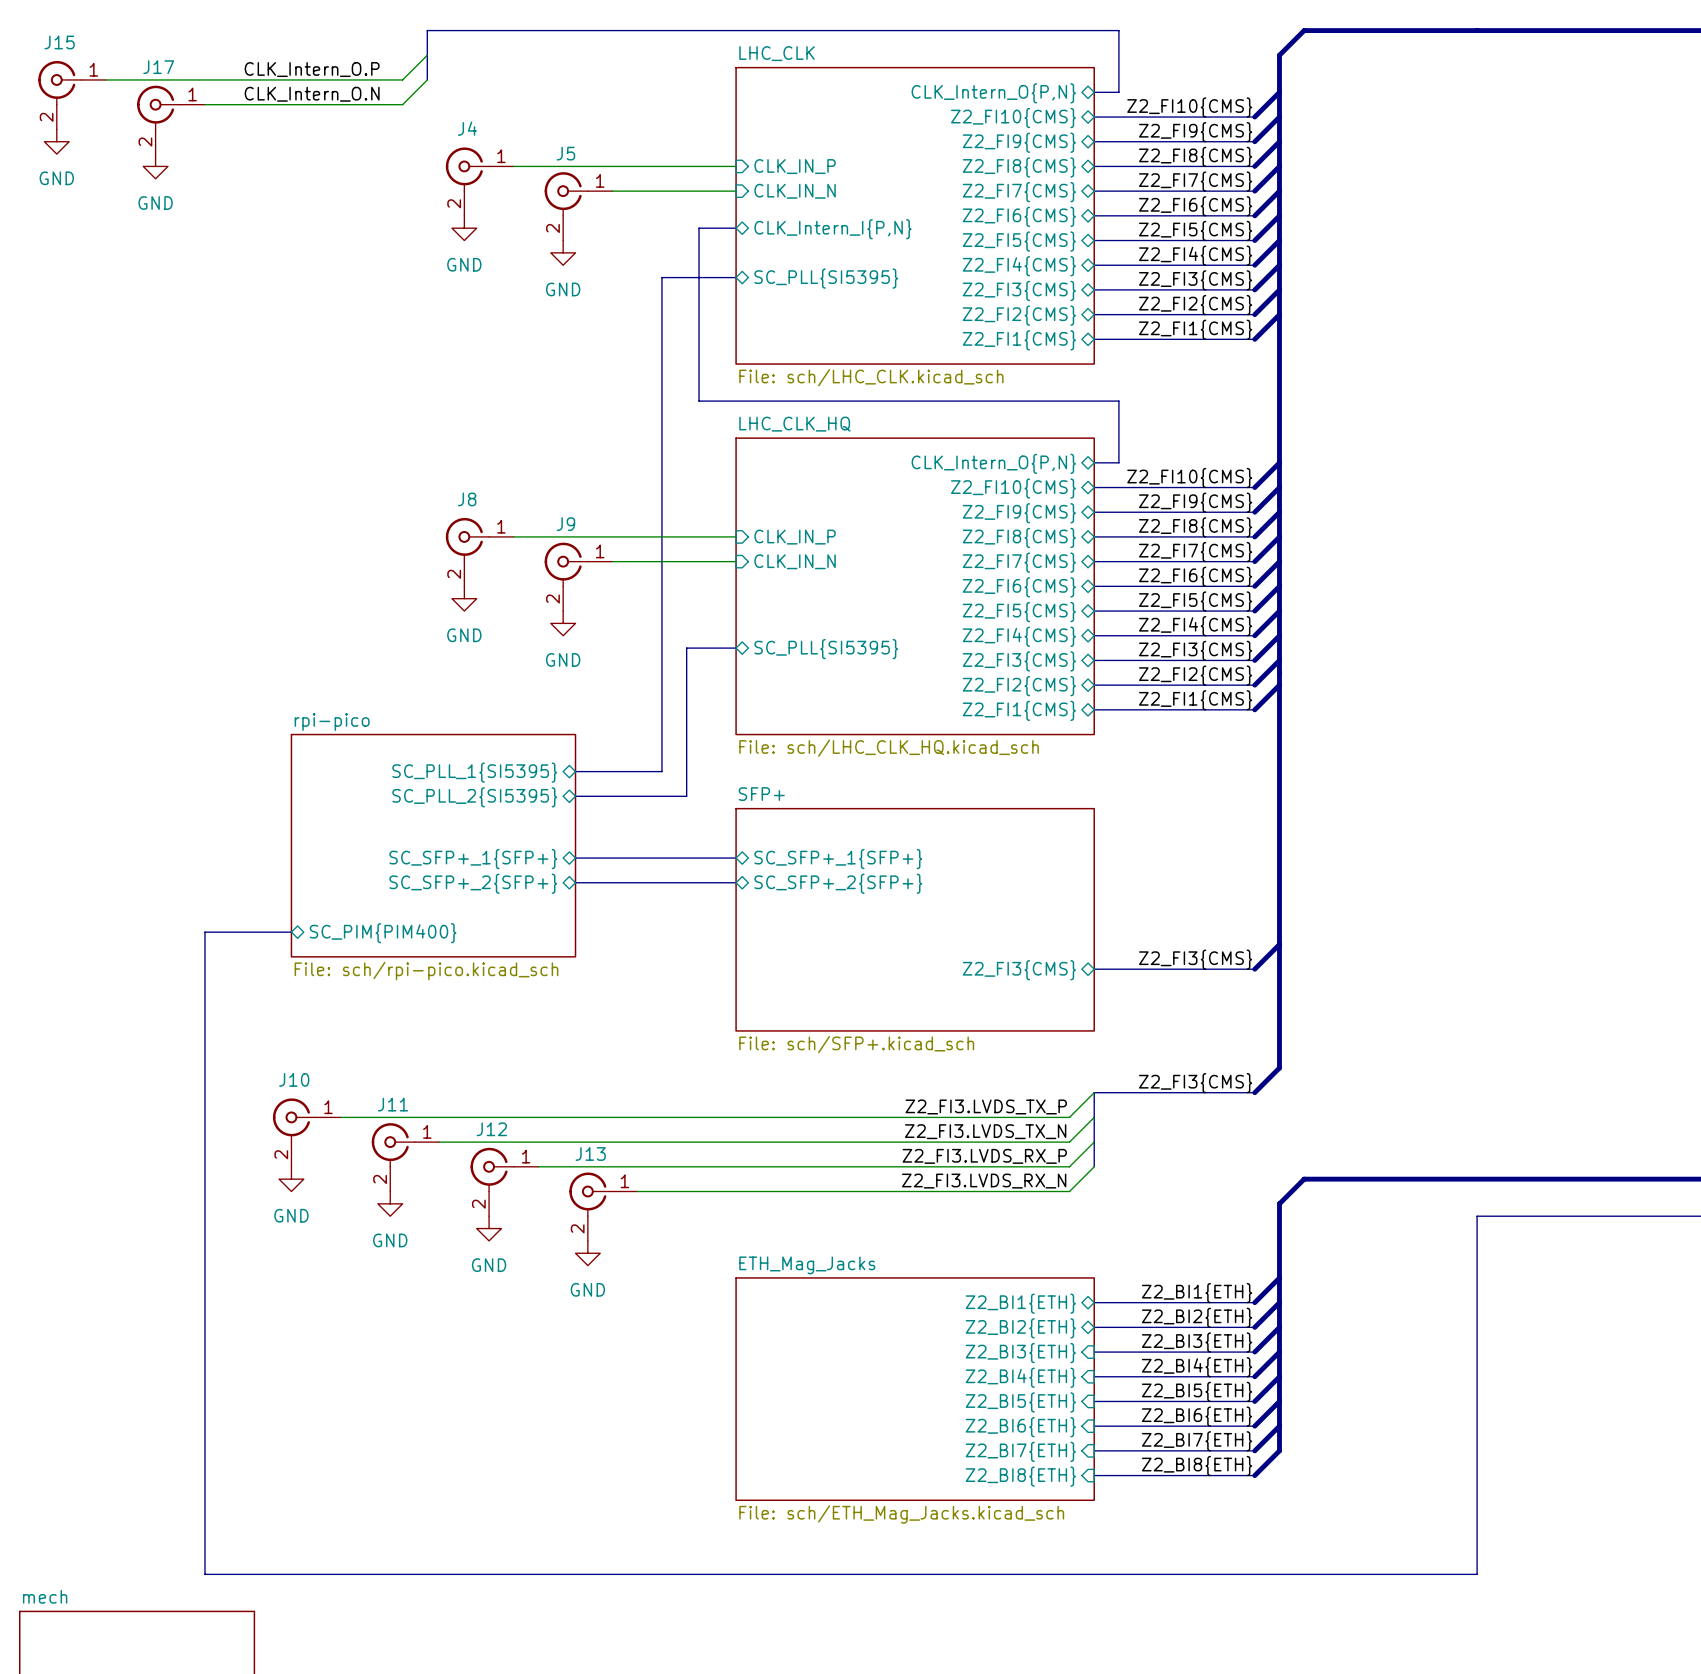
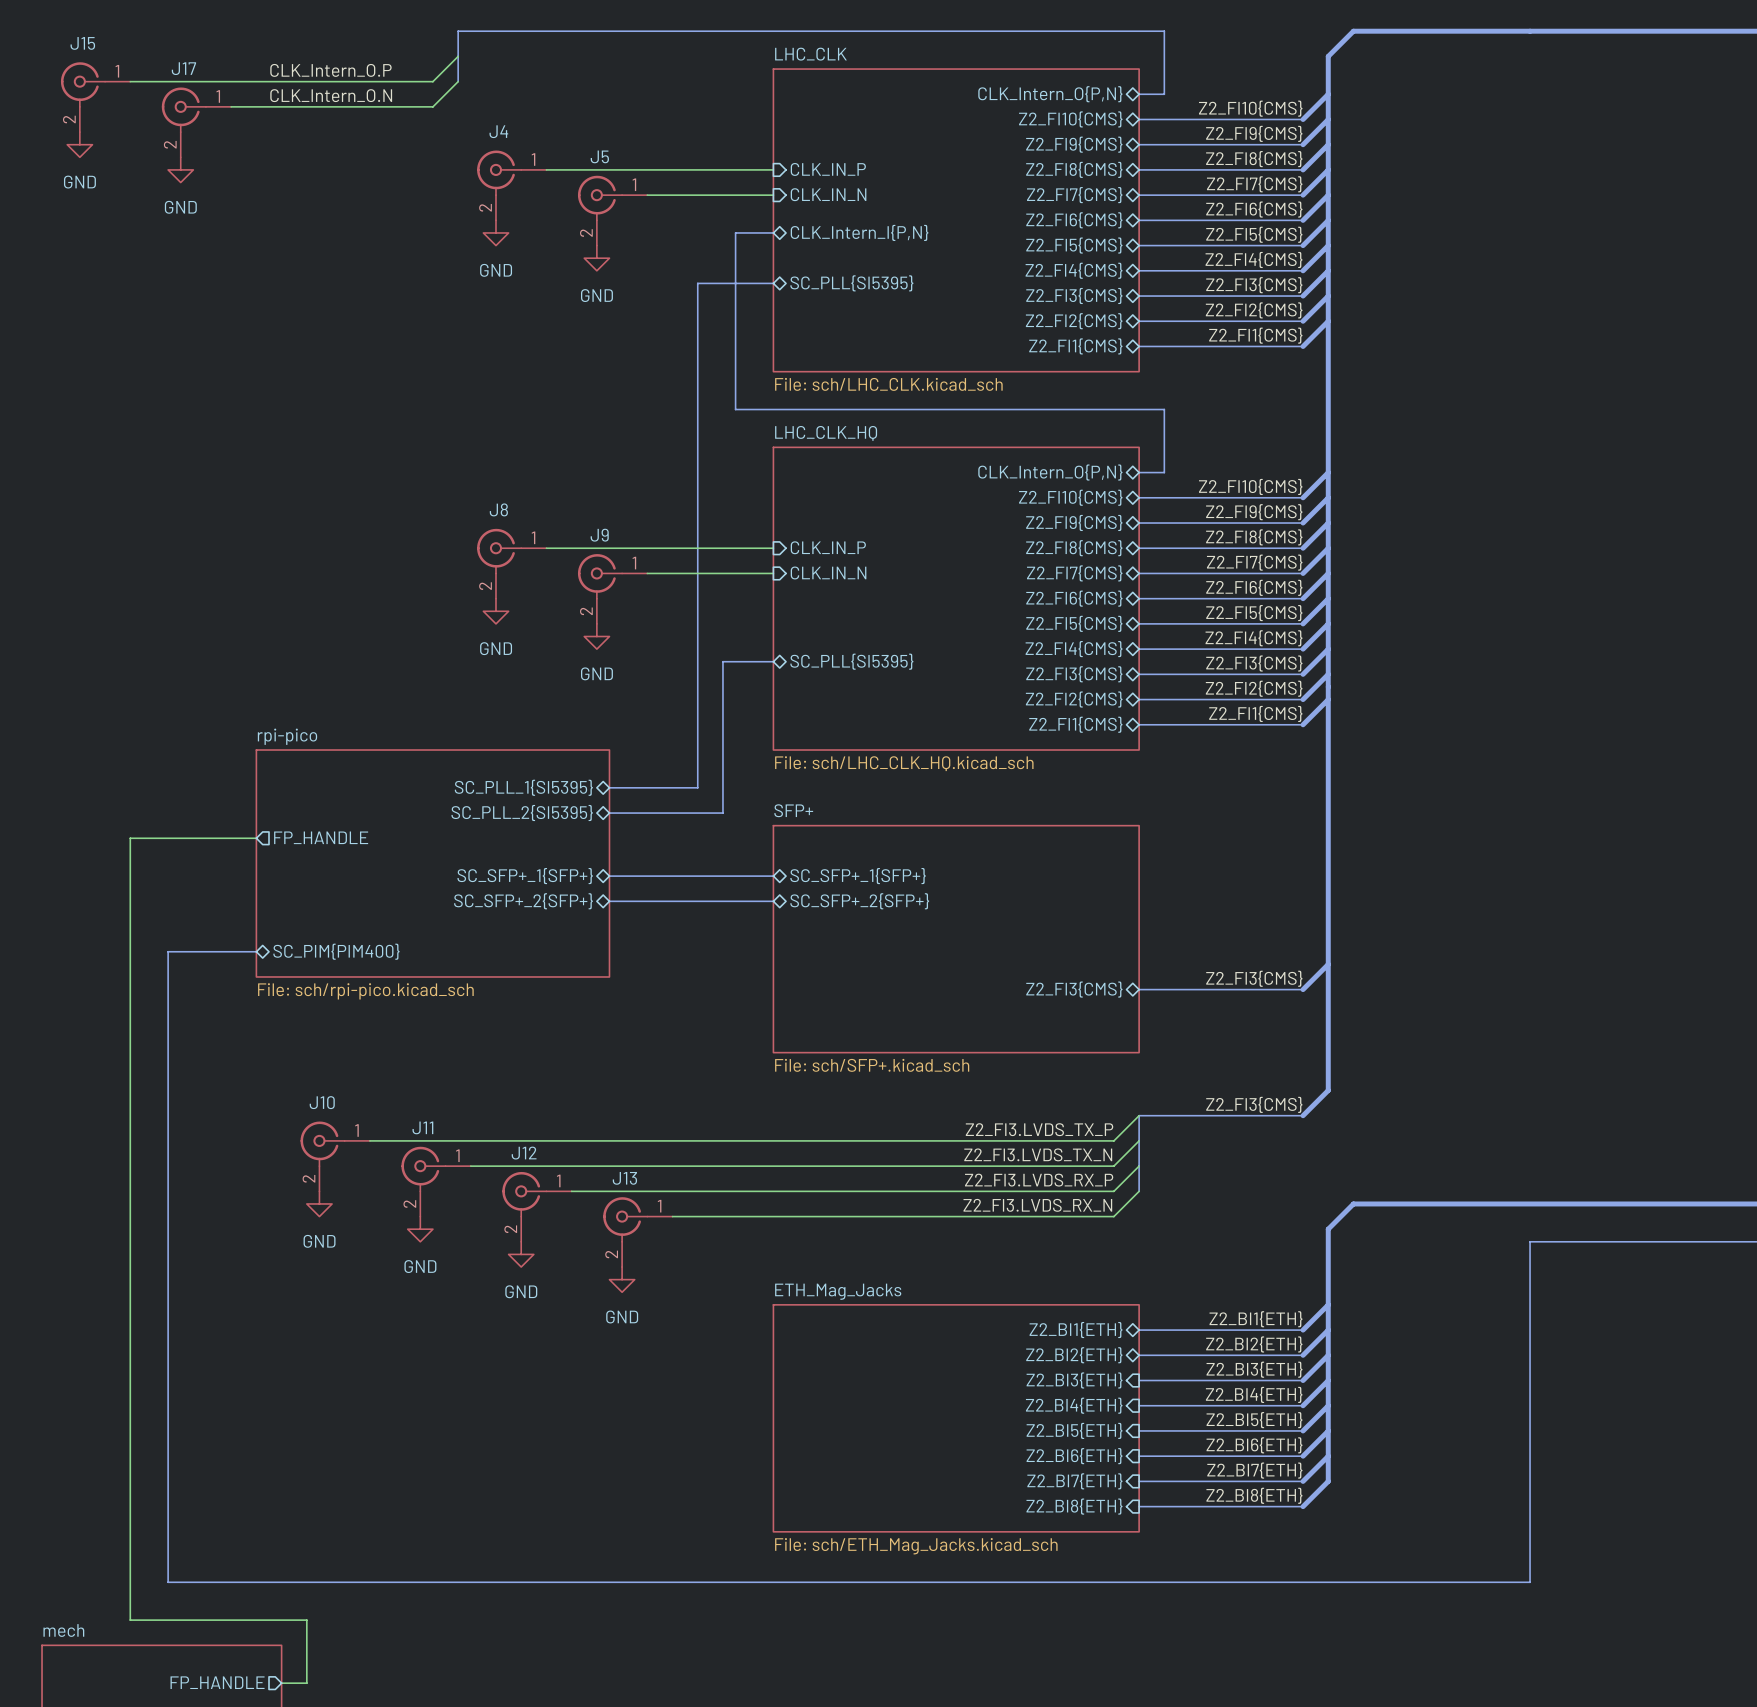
wire: none -> (256, 838) (130, 838) (130, 1620) (306, 1620) (306, 1683) (281, 1683)
sheet pin: none -> FP_HANDLE (321, 837)
sheet rpi-pico: none -> File: sch/rpi-pico.kicad_sch (432, 863)
sheet rpi-pico: File: sch/rpi-pico.kicad_sch (433, 845) -> none
bus: (205, 932) (205, 1574) (1477, 1574) (1477, 1549) -> (231, 951) (168, 951) (168, 1582) (1530, 1582)
bus: (229, 932) (291, 932) -> none
sheet pin position: SC_PIM{PIM400} (383, 933) -> SC_PIM{PIM400} (336, 951)
sheet pin: none -> FP_HANDLE (217, 1682)

